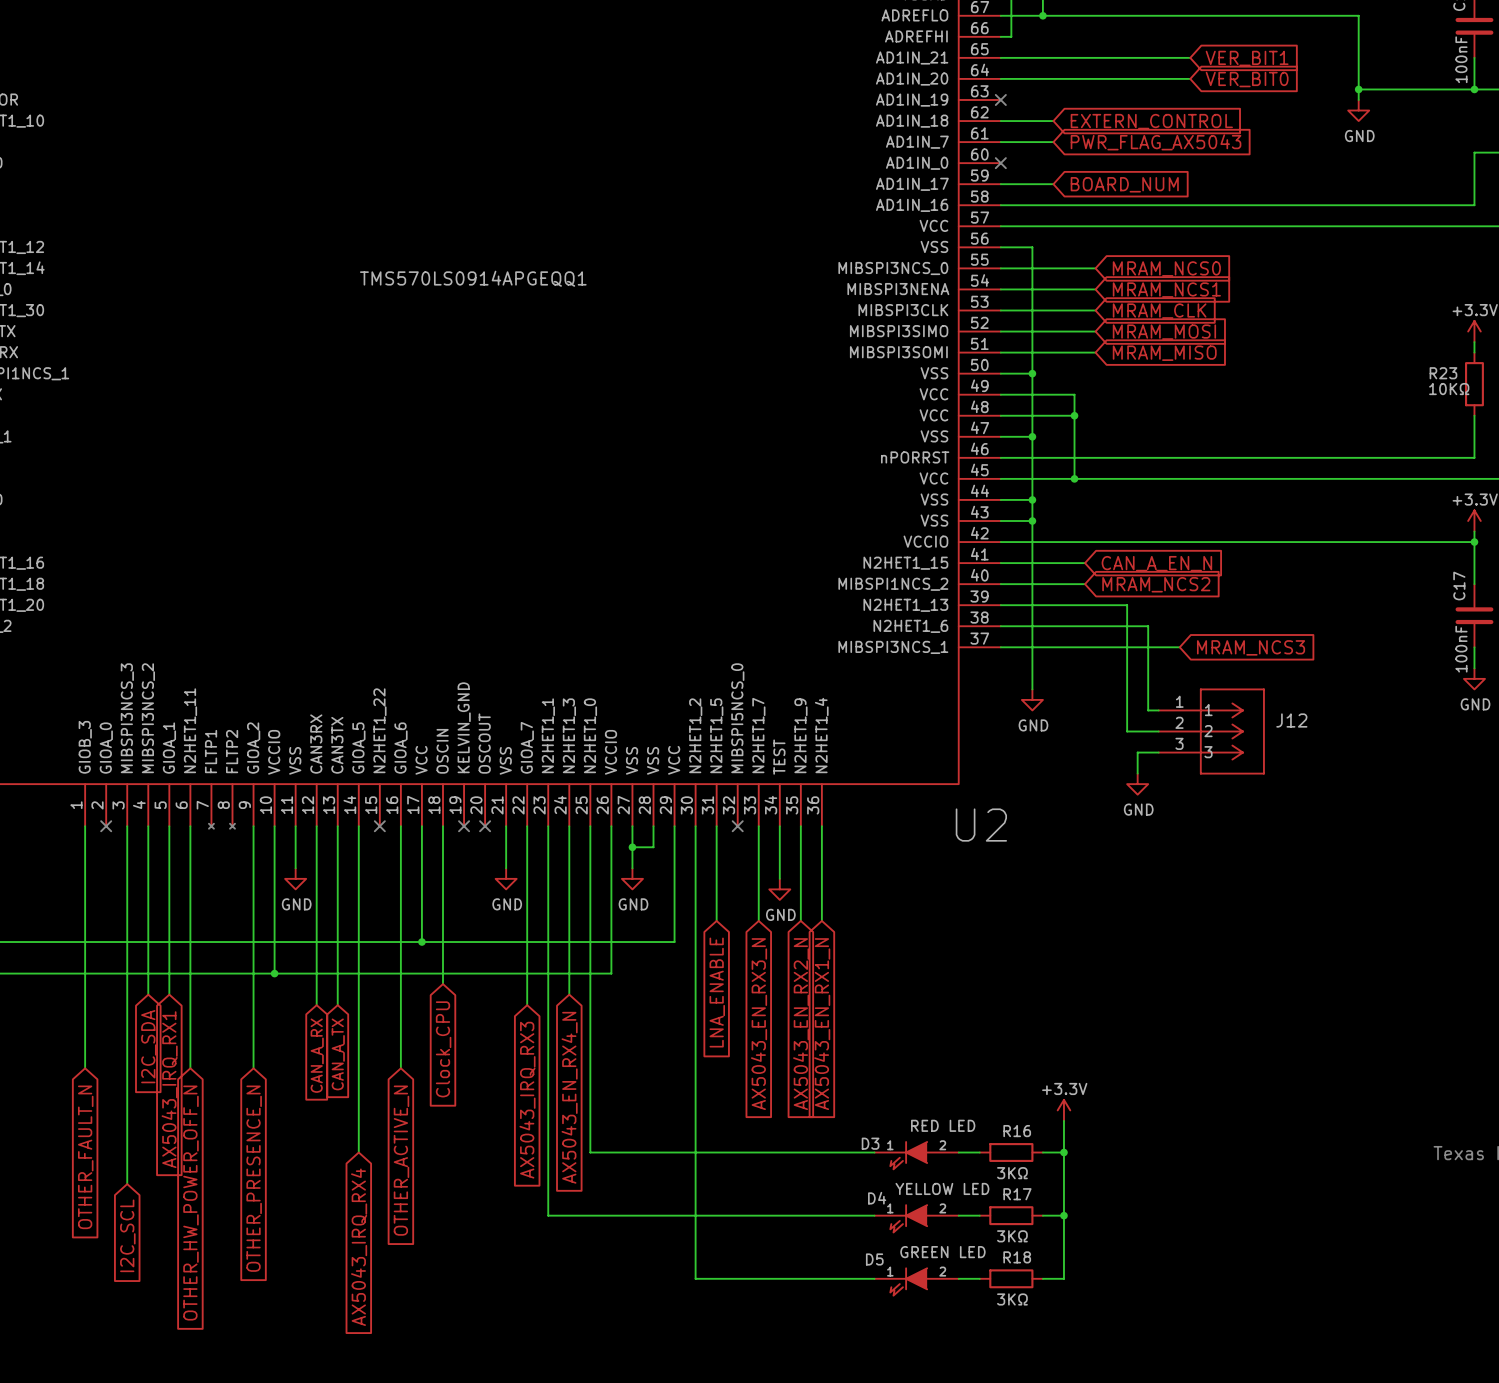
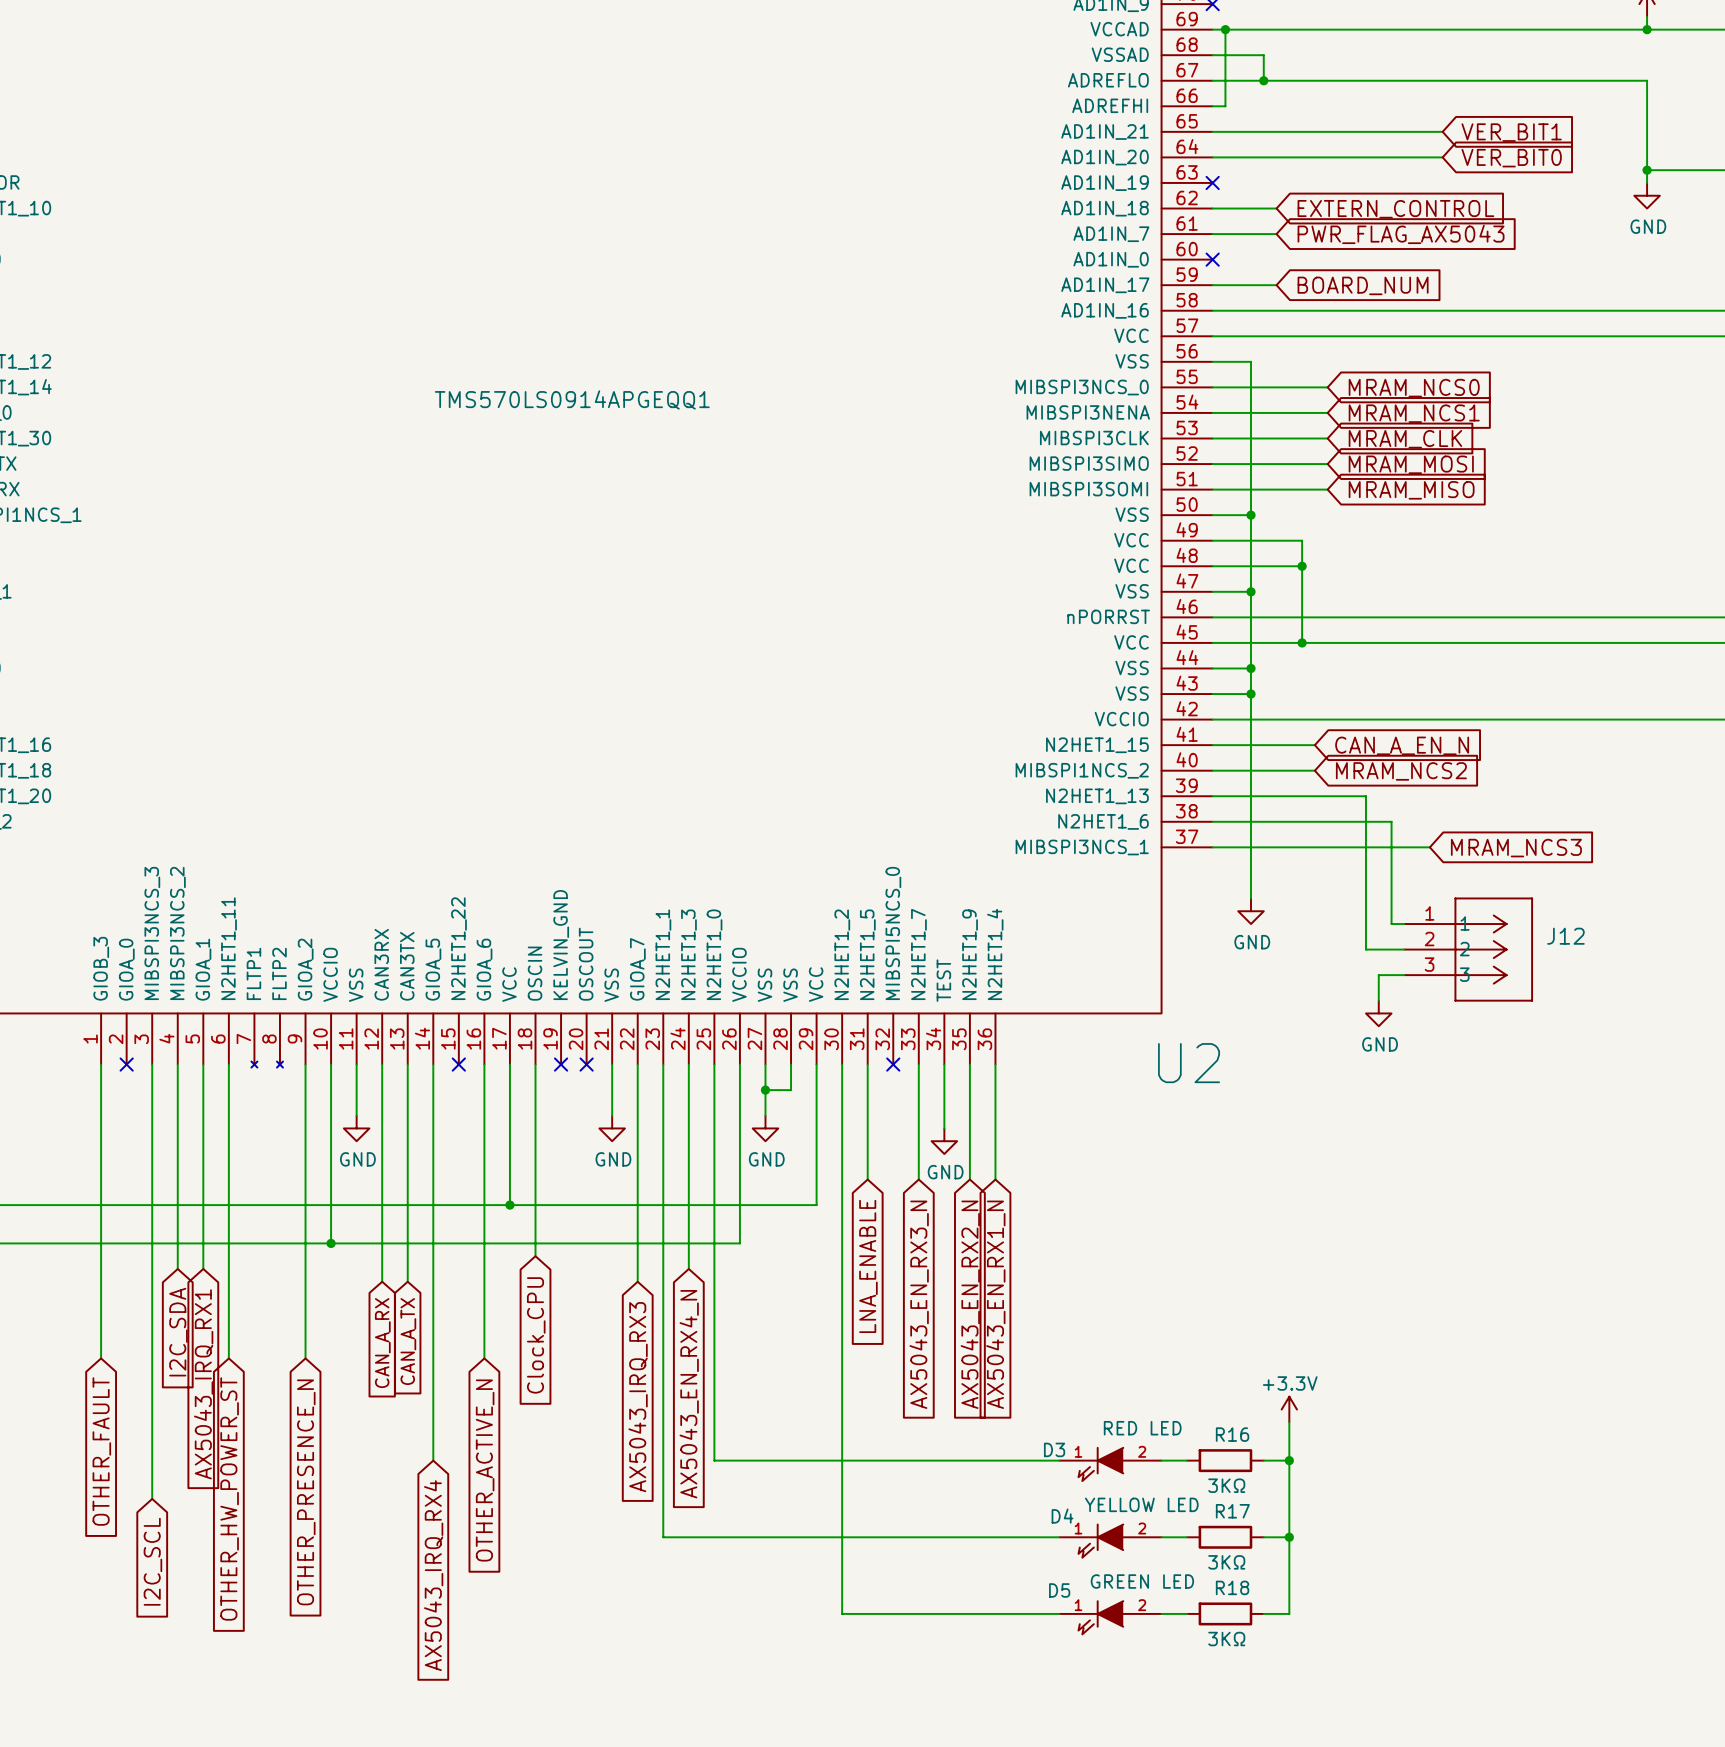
global label: OTHER_FAULT_N (85, 1157) -> OTHER_FAULT (101, 1451)
global label: OTHER_HW_POWER_OFF_N (190, 1203) -> OTHER_HW_POWER_ST (229, 1498)

